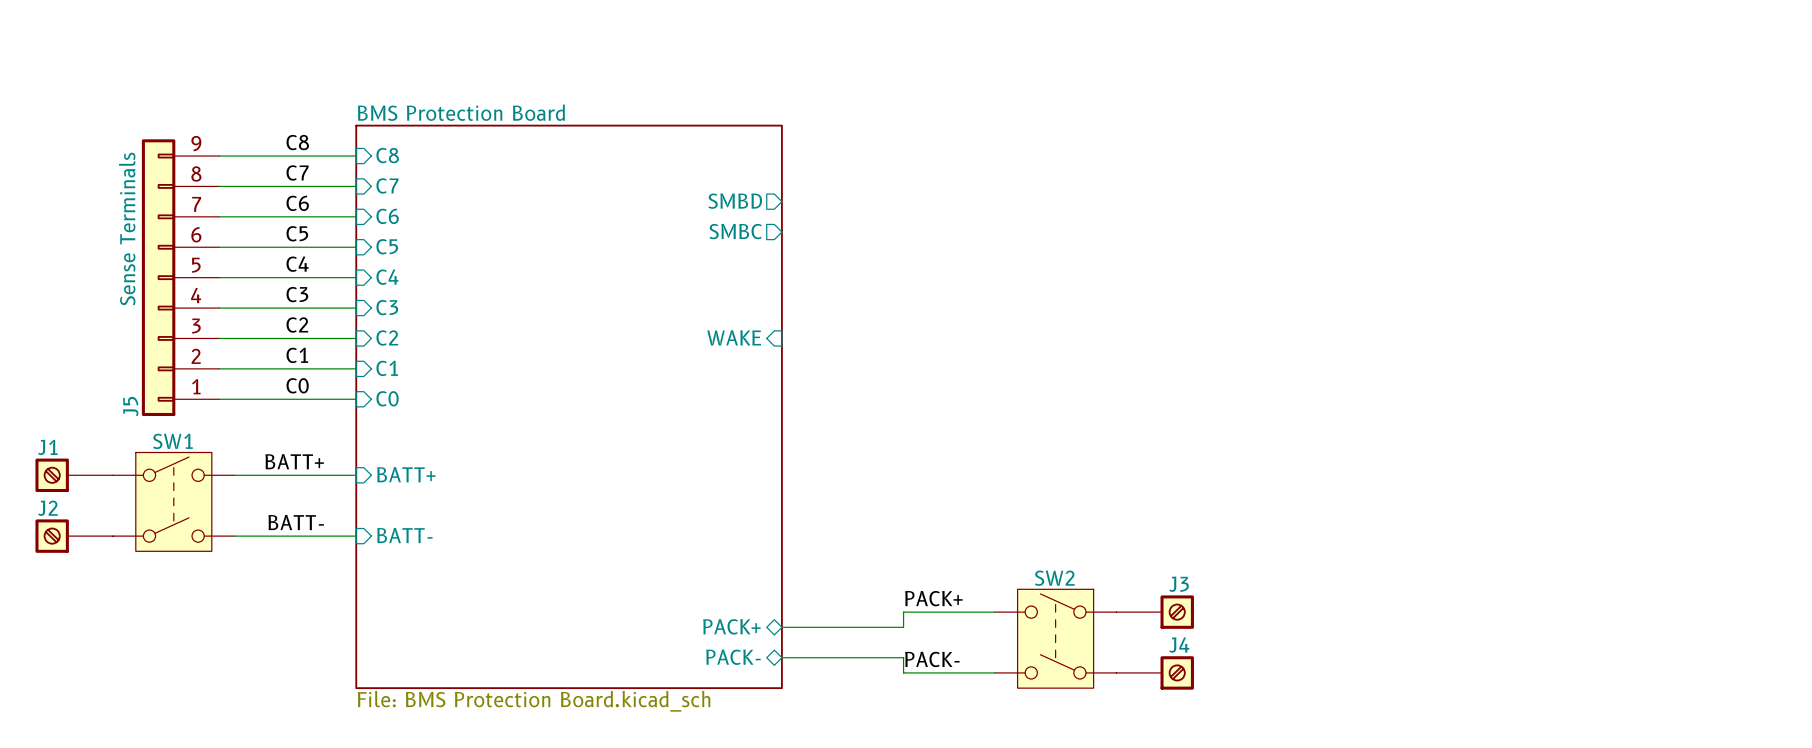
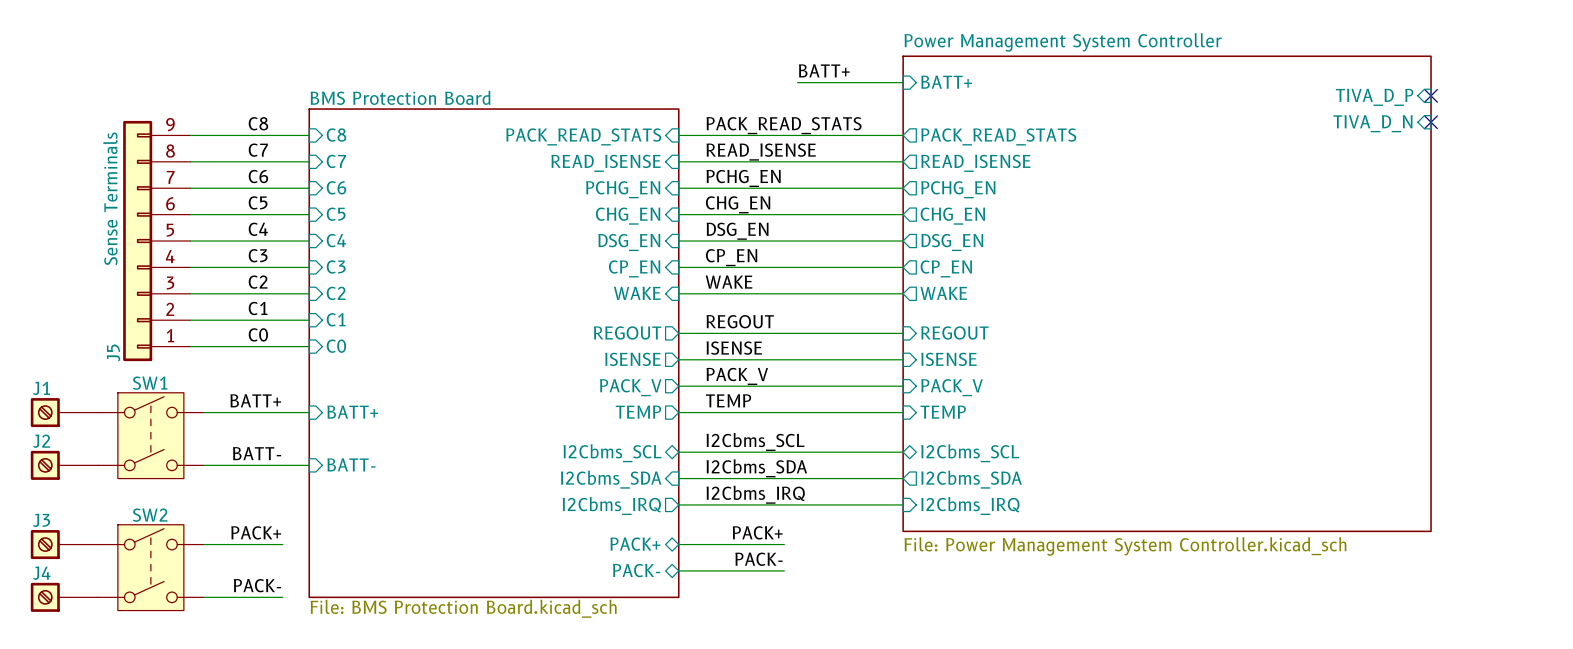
label: none -> BATT+ (824, 70)
sheet pin: none -> BATT+ (946, 82)
wire: none -> (797, 82) (903, 82)
no-connect mark: none -> (1431, 95)
sheet pin: none -> TIVA_D_P (1374, 97)
no-connect mark: none -> (1431, 122)
sheet pin: none -> TIVA_D_N (1372, 123)
label: none -> PACK_READ_STATS (784, 125)
wire: none -> (678, 135) (903, 135)
sheet pin: none -> PACK_READ_STATS (583, 136)
sheet pin: none -> PACK_READ_STATS (998, 136)
label: none -> READ_ISENSE (761, 152)
wire: none -> (678, 161) (903, 161)
sheet pin: none -> READ_ISENSE (606, 163)
sheet pin: none -> READ_ISENSE (975, 163)
sheet pin: SMBD (735, 201) -> none
label: none -> PCHG_EN (743, 178)
wire: none -> (678, 188) (903, 188)
sheet pin: none -> PCHG_EN (623, 189)
sheet pin: none -> PCHG_EN (958, 189)
sheet pin: SMBC (735, 231) -> none
label: none -> CHG_EN (738, 204)
wire: none -> (678, 214) (903, 214)
sheet pin: none -> CHG_EN (628, 216)
sheet pin: none -> CHG_EN (952, 216)
label: none -> DSG_EN (737, 231)
wire: none -> (678, 241) (903, 241)
sheet pin: none -> DSG_EN (629, 242)
sheet pin: none -> DSG_EN (952, 242)
label: none -> CP_EN (731, 257)
wire: none -> (678, 267) (903, 267)
sheet pin: none -> CP_EN (634, 268)
sheet pin: none -> CP_EN (946, 268)
label: none -> WAKE (729, 282)
sheet pin: none -> WAKE (943, 293)
wire: none -> (678, 293) (903, 293)
sheet Power Management System Controller: none -> File: Power Management System Controller.kicad_sch (1167, 293)
label: none -> REGOUT (740, 321)
sheet pin: none -> REGOUT (627, 332)
sheet pin: none -> REGOUT (954, 332)
wire: none -> (678, 333) (903, 333)
label: none -> ISENSE (734, 348)
sheet pin: none -> ISENSE (632, 359)
sheet pin: none -> ISENSE (948, 359)
wire: none -> (678, 359) (903, 359)
label: none -> PACK_V (737, 376)
wire: none -> (678, 386) (903, 386)
sheet pin: none -> PACK_V (630, 387)
sheet pin: none -> PACK_V (951, 387)
label: none -> TEMP (728, 400)
sheet pin: none -> TEMP (638, 412)
sheet pin: none -> TEMP (943, 412)
wire: none -> (678, 412) (903, 412)
label: none -> I2Cbms_SCL (755, 441)
wire: none -> (678, 452) (903, 452)
sheet pin: none -> I2Cbms_SCL (612, 453)
sheet pin: none -> I2Cbms_SCL (970, 453)
label: none -> I2Cbms_SDA (756, 468)
wire: none -> (678, 478) (903, 478)
sheet pin: none -> I2Cbms_SDA (611, 479)
sheet pin: none -> I2Cbms_SDA (971, 479)
label: none -> I2Cbms_IRQ (755, 494)
wire: none -> (678, 504) (903, 504)
sheet pin: none -> I2Cbms_IRQ (611, 506)
sheet pin: none -> I2Cbms_IRQ (970, 506)
label position: PACK+ (933, 598) -> PACK+ (757, 532)
wire: (994, 612) (903, 612) (903, 627) -> none
J3 position: (1155, 612) -> (64, 544)
J3 flip: as is (1177, 612) -> left-right (45, 544)
label: none -> PACK+ (256, 532)
wire: none -> (203, 544) (282, 544)
SW2 flip: as is (1055, 638) -> left-right (150, 567)
SW2 position: (1055, 638) -> (150, 567)
wire: (903, 657) (903, 672) (994, 672) -> none
label position: PACK- (932, 659) -> PACK- (758, 559)
J4 position: (1155, 672) -> (64, 597)
J4 flip: as is (1177, 672) -> left-right (45, 597)
label: none -> PACK- (257, 585)
wire: none -> (203, 597) (282, 597)

